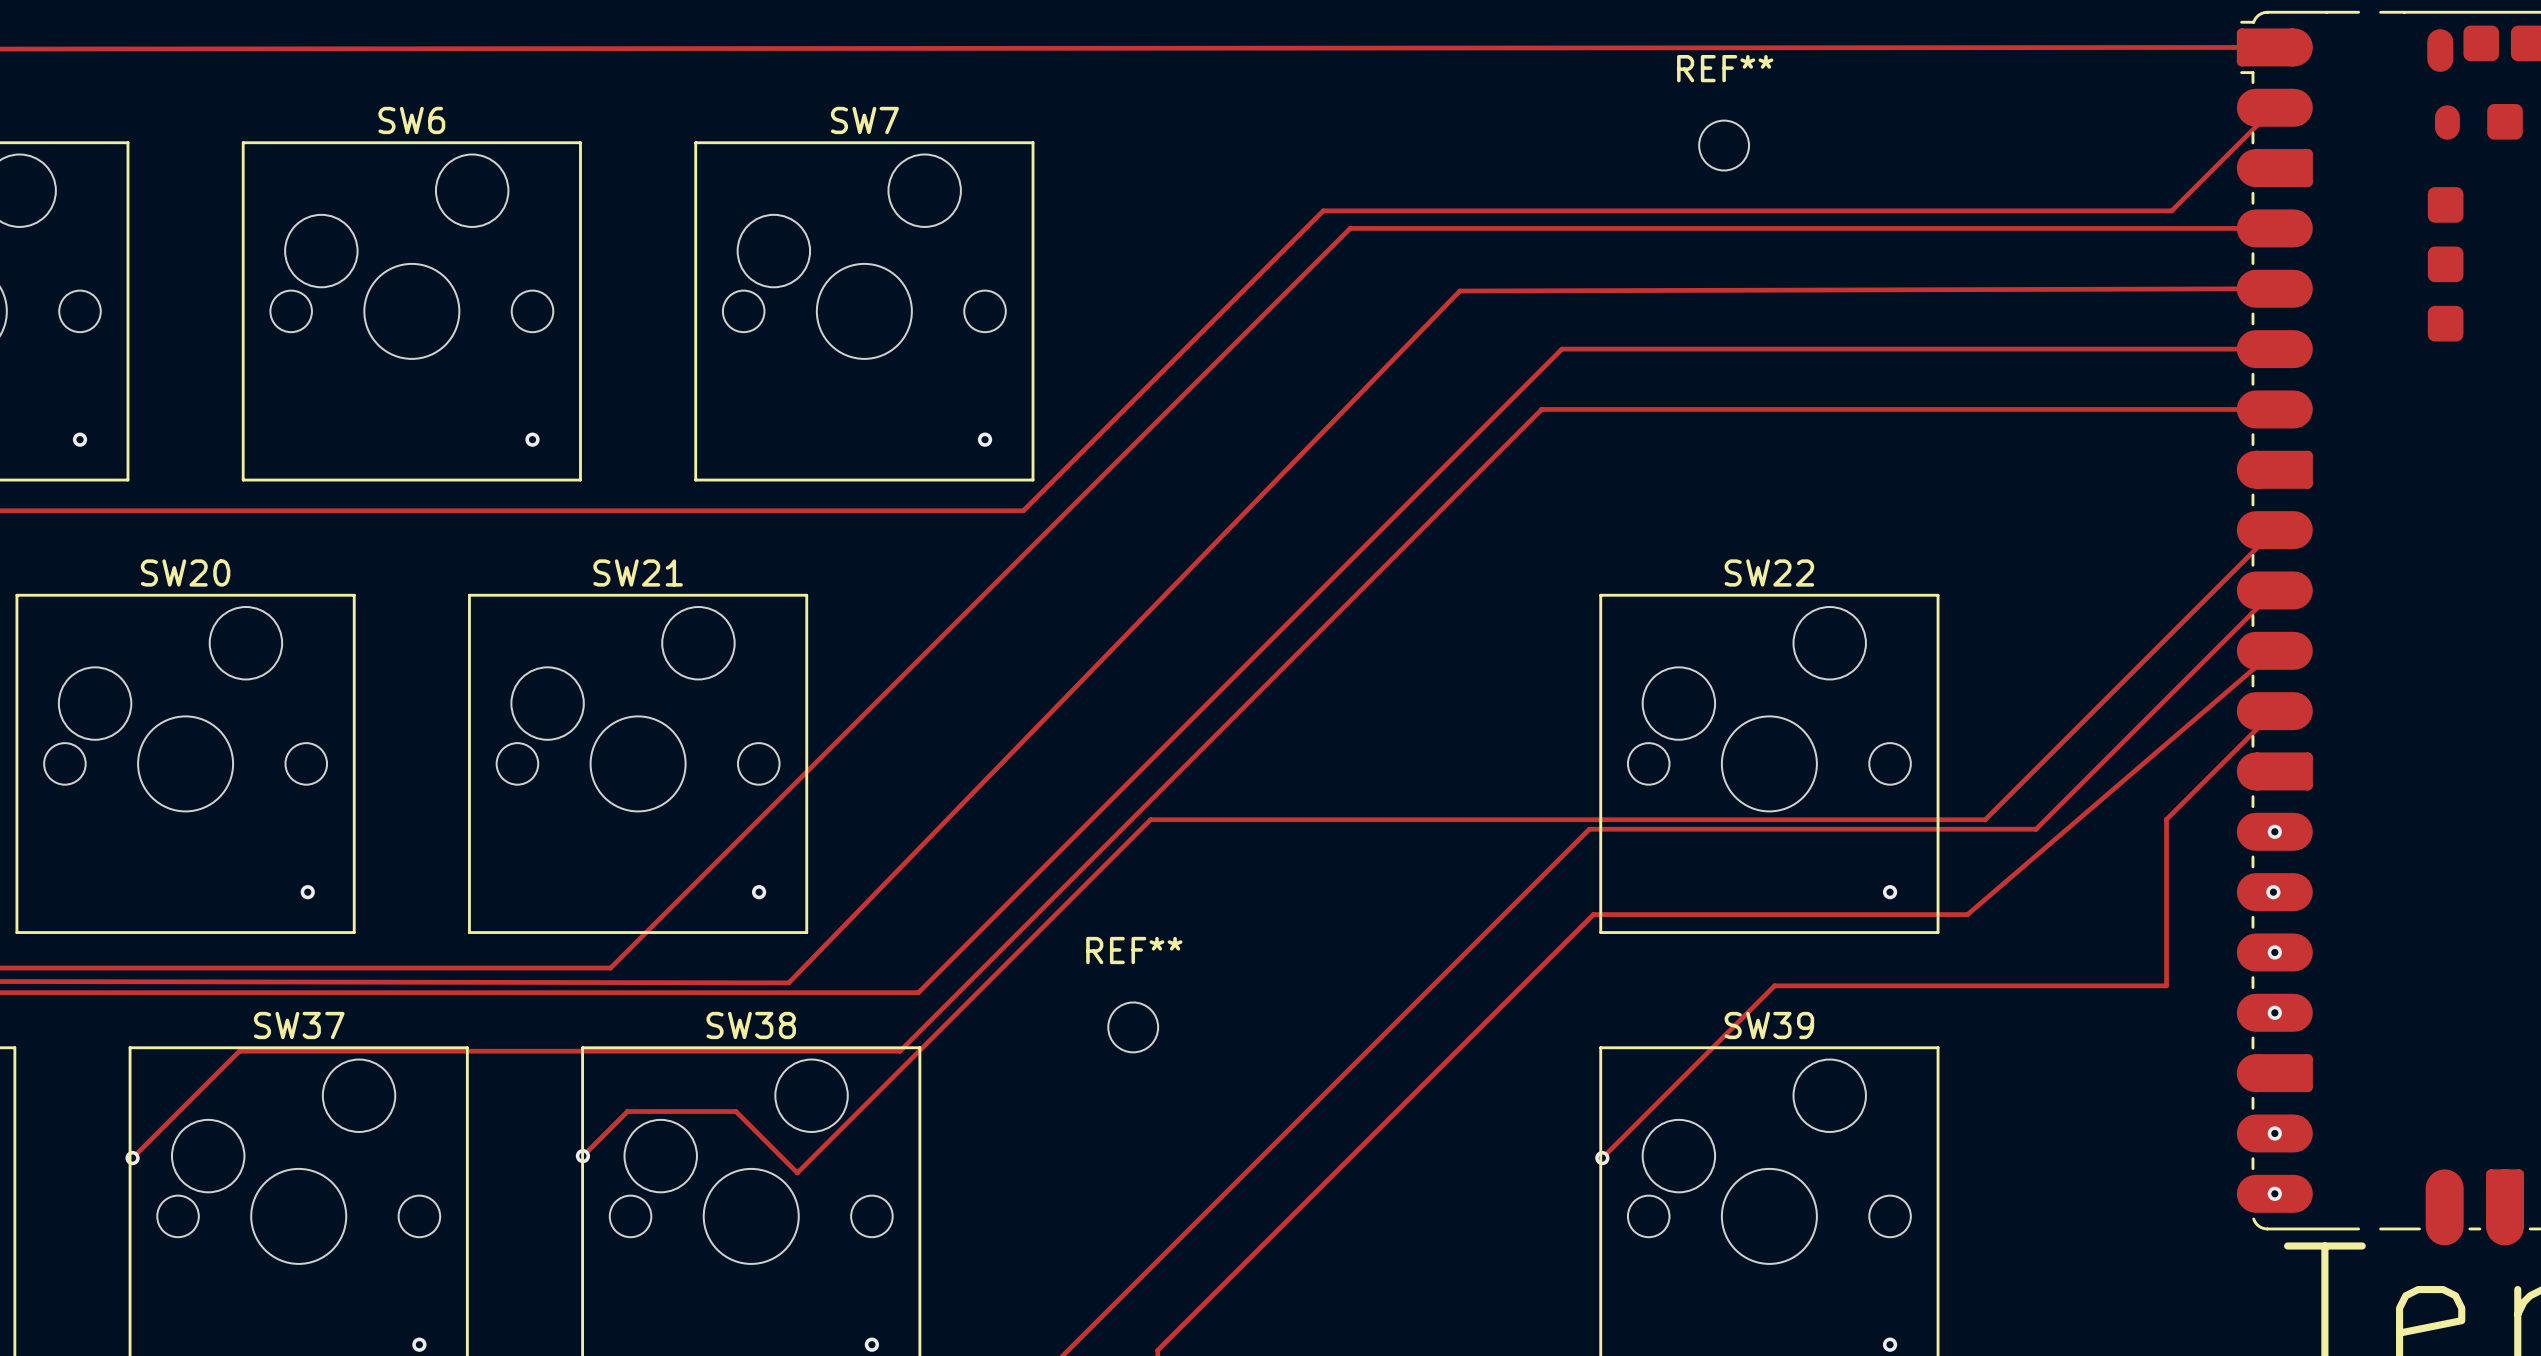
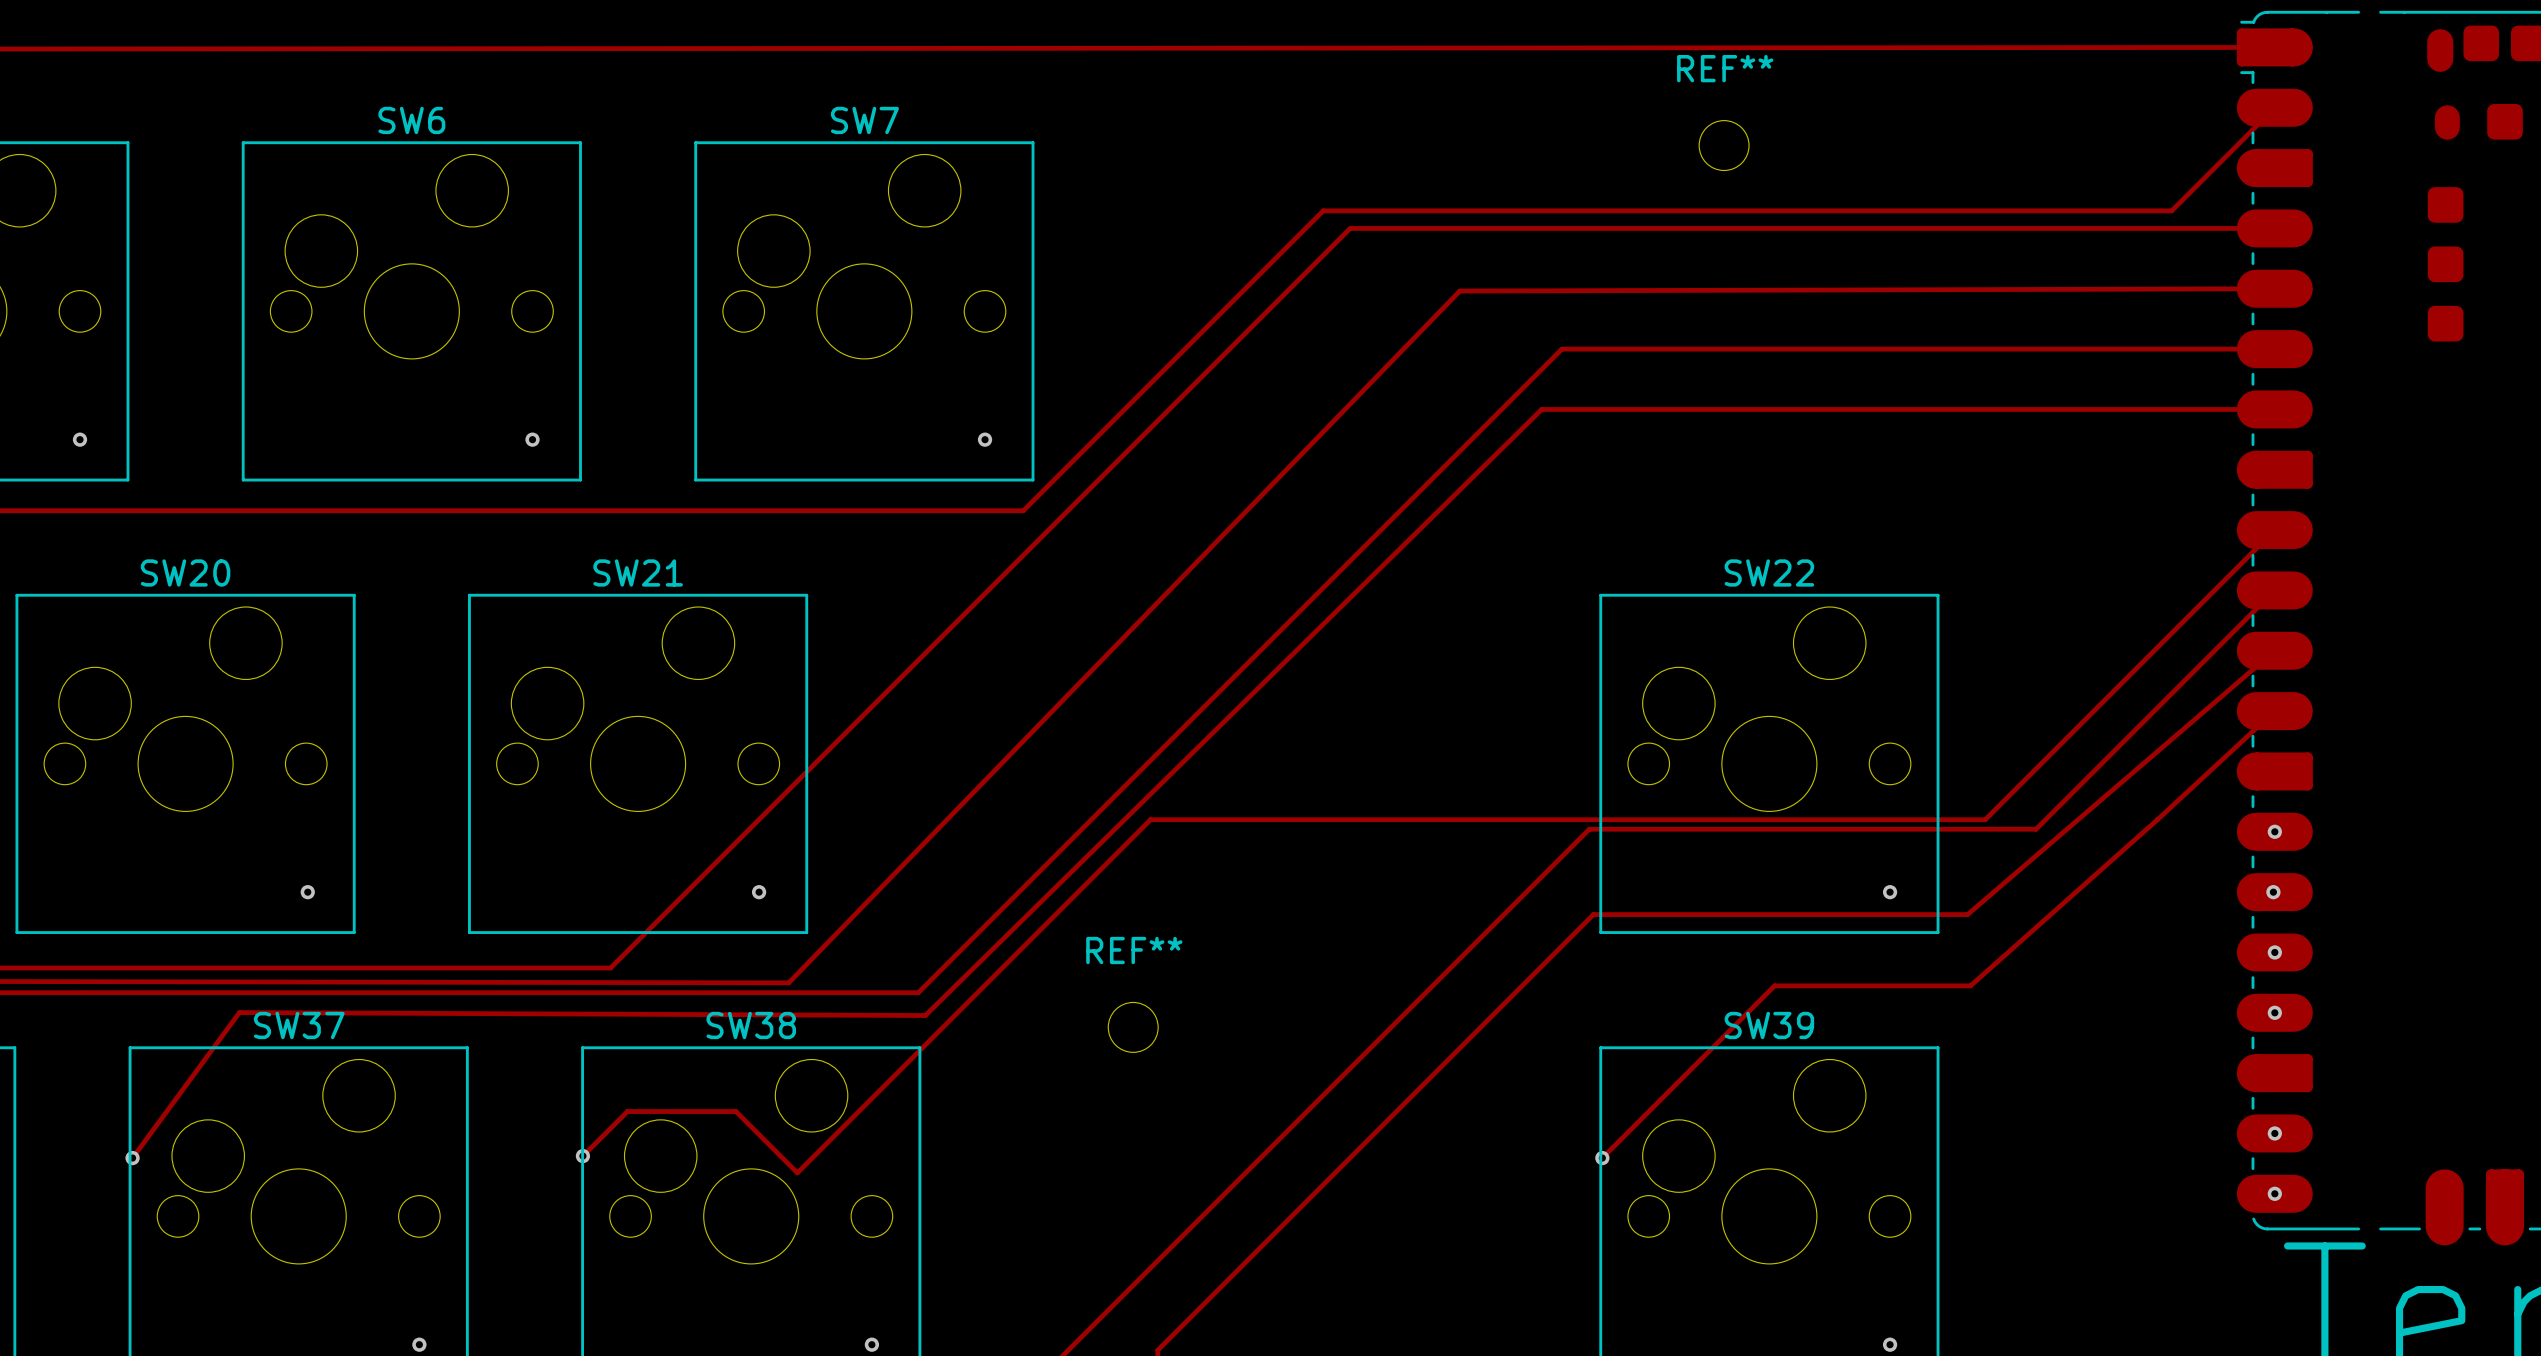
track: (1541, 409) (900, 1051) (239, 1051) (132, 1158) -> (1541, 409) (925, 1015) (239, 1012) (132, 1158)
track: (2274, 711) (2166, 819) (2166, 985) (1970, 985) -> (2274, 711) (2157, 819) (1970, 985)

